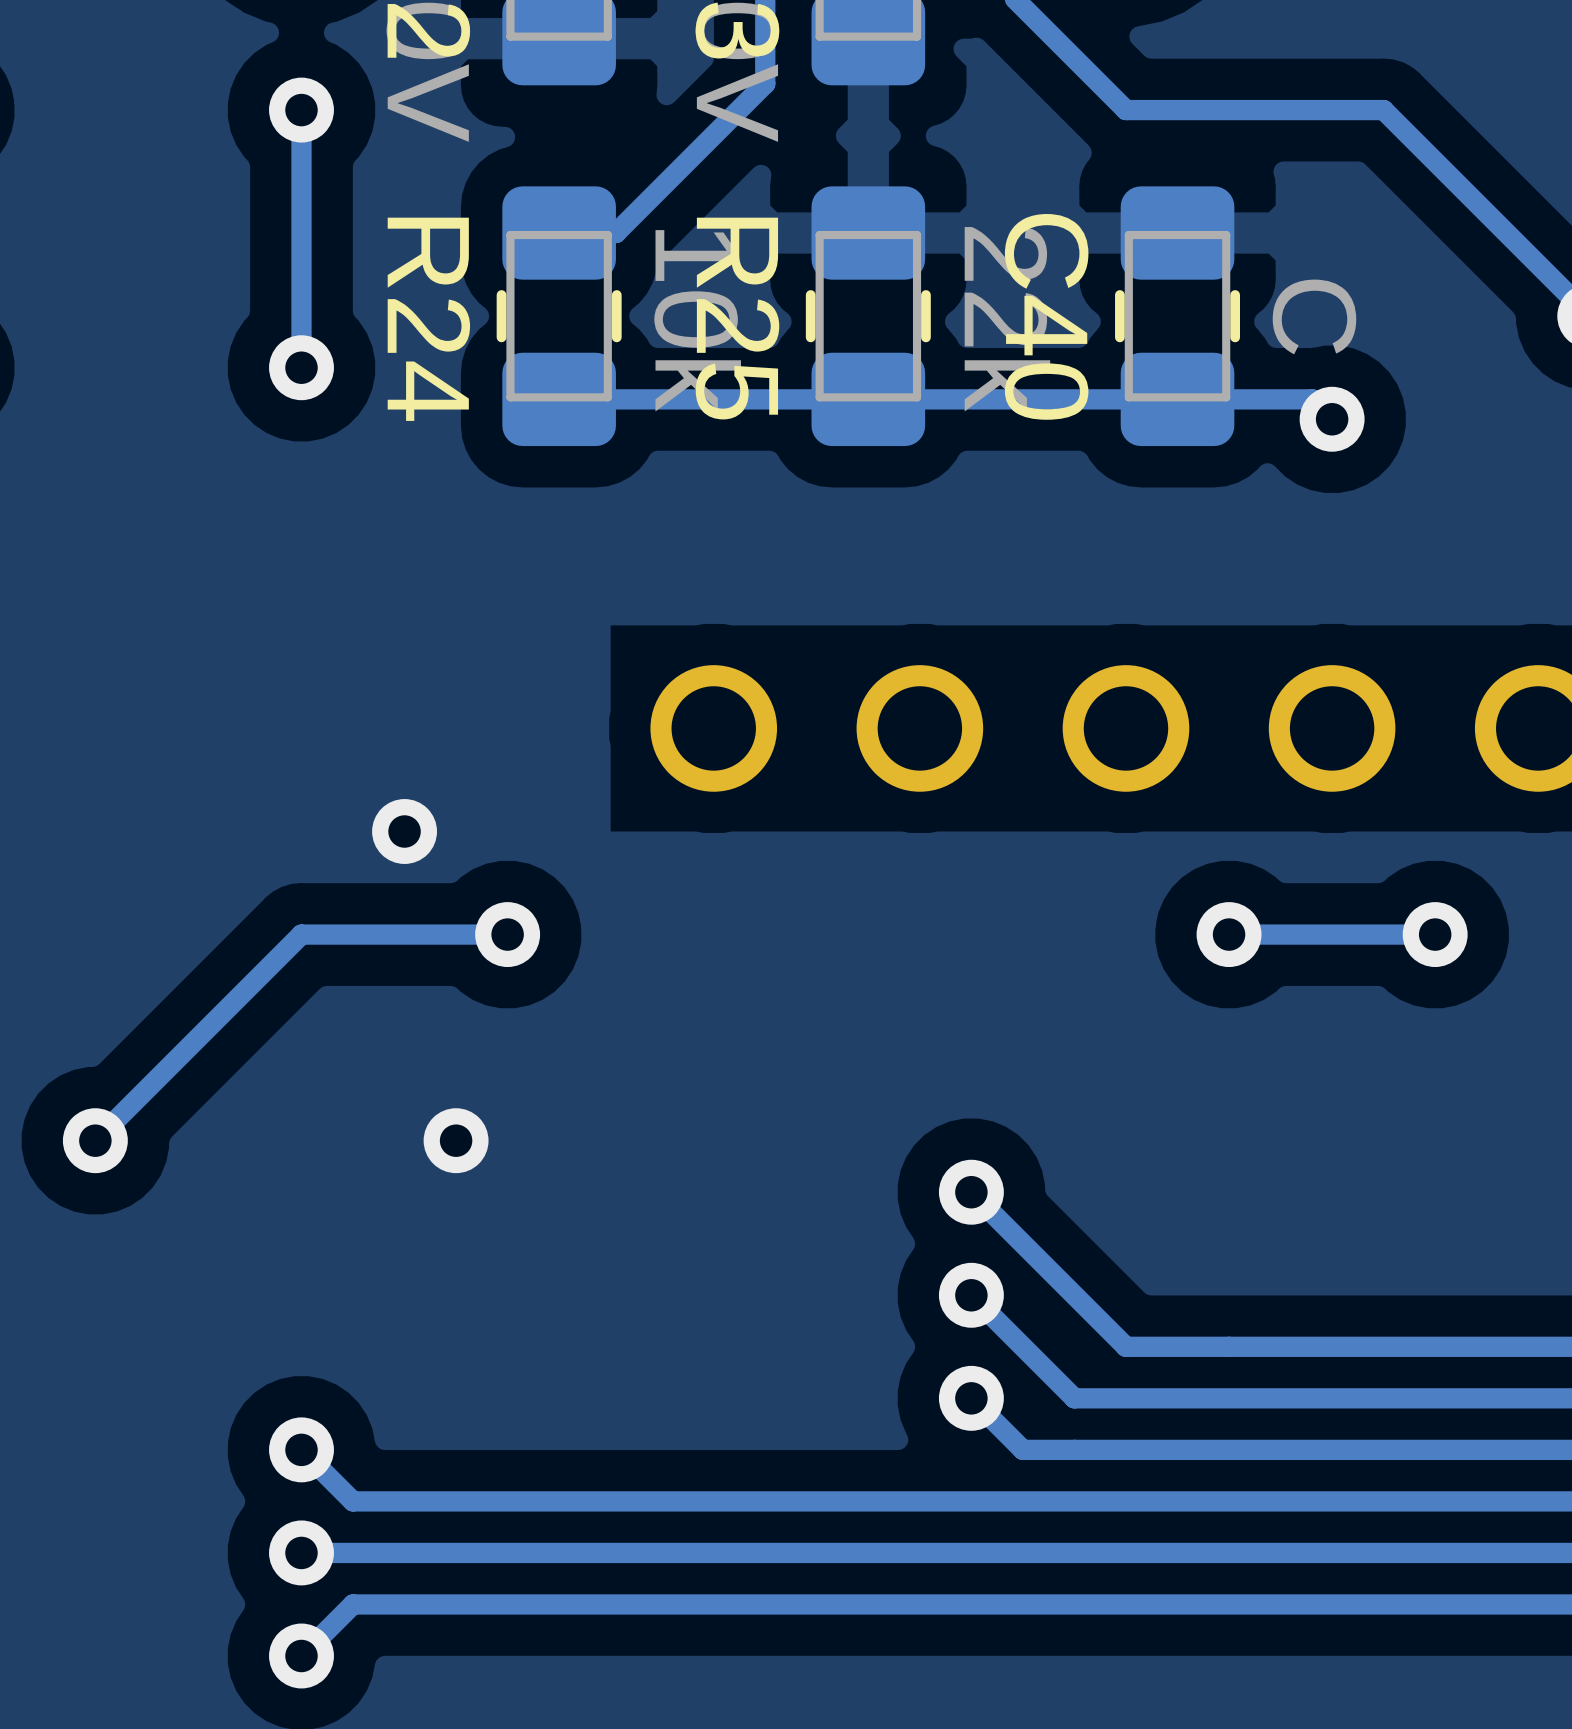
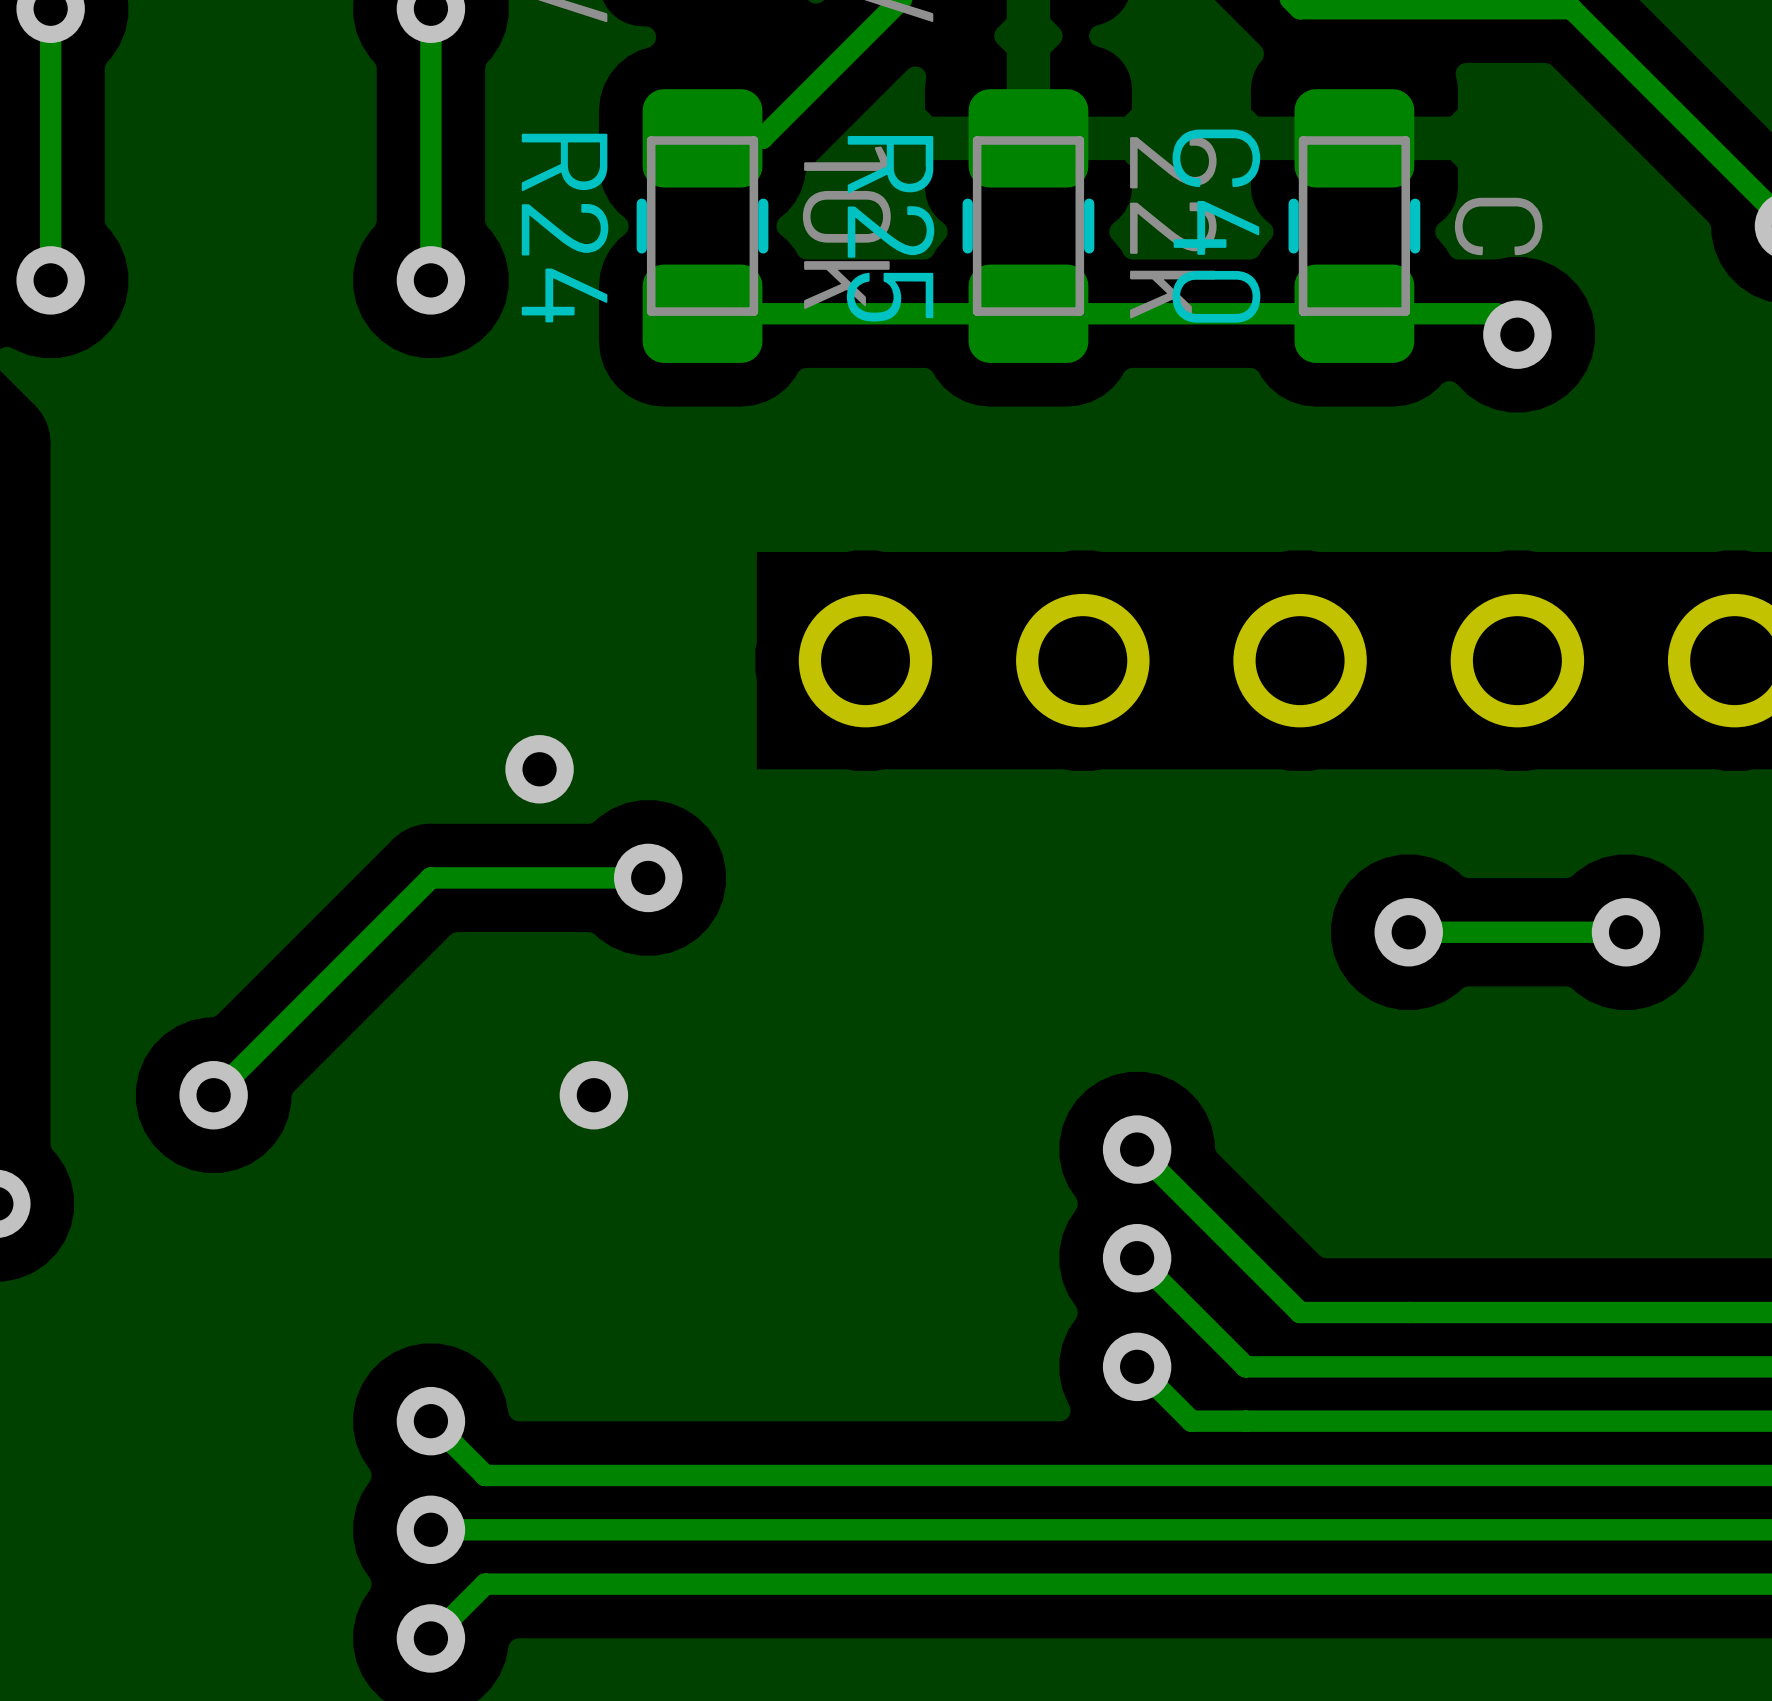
via position: (1229, 934) -> (1408, 932)
track: (1435, 934) (1229, 934) -> (1626, 932) (1408, 932)
via position: (1435, 934) -> (1626, 932)

